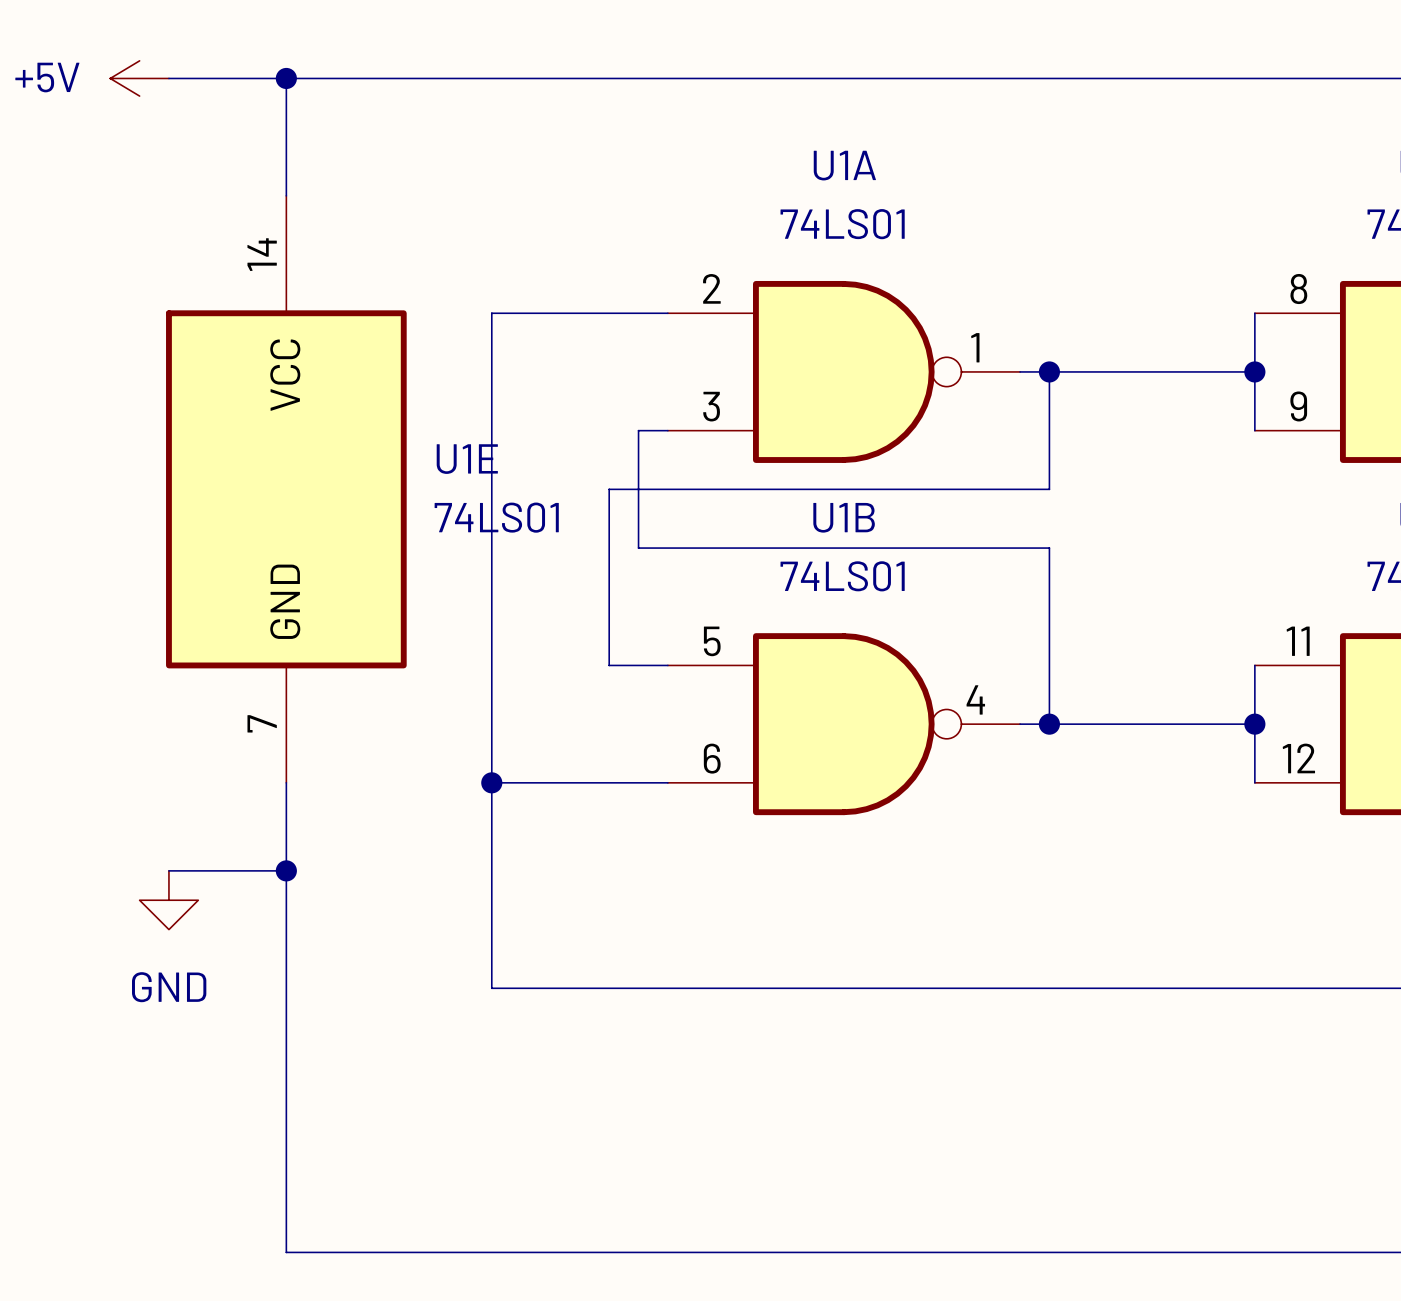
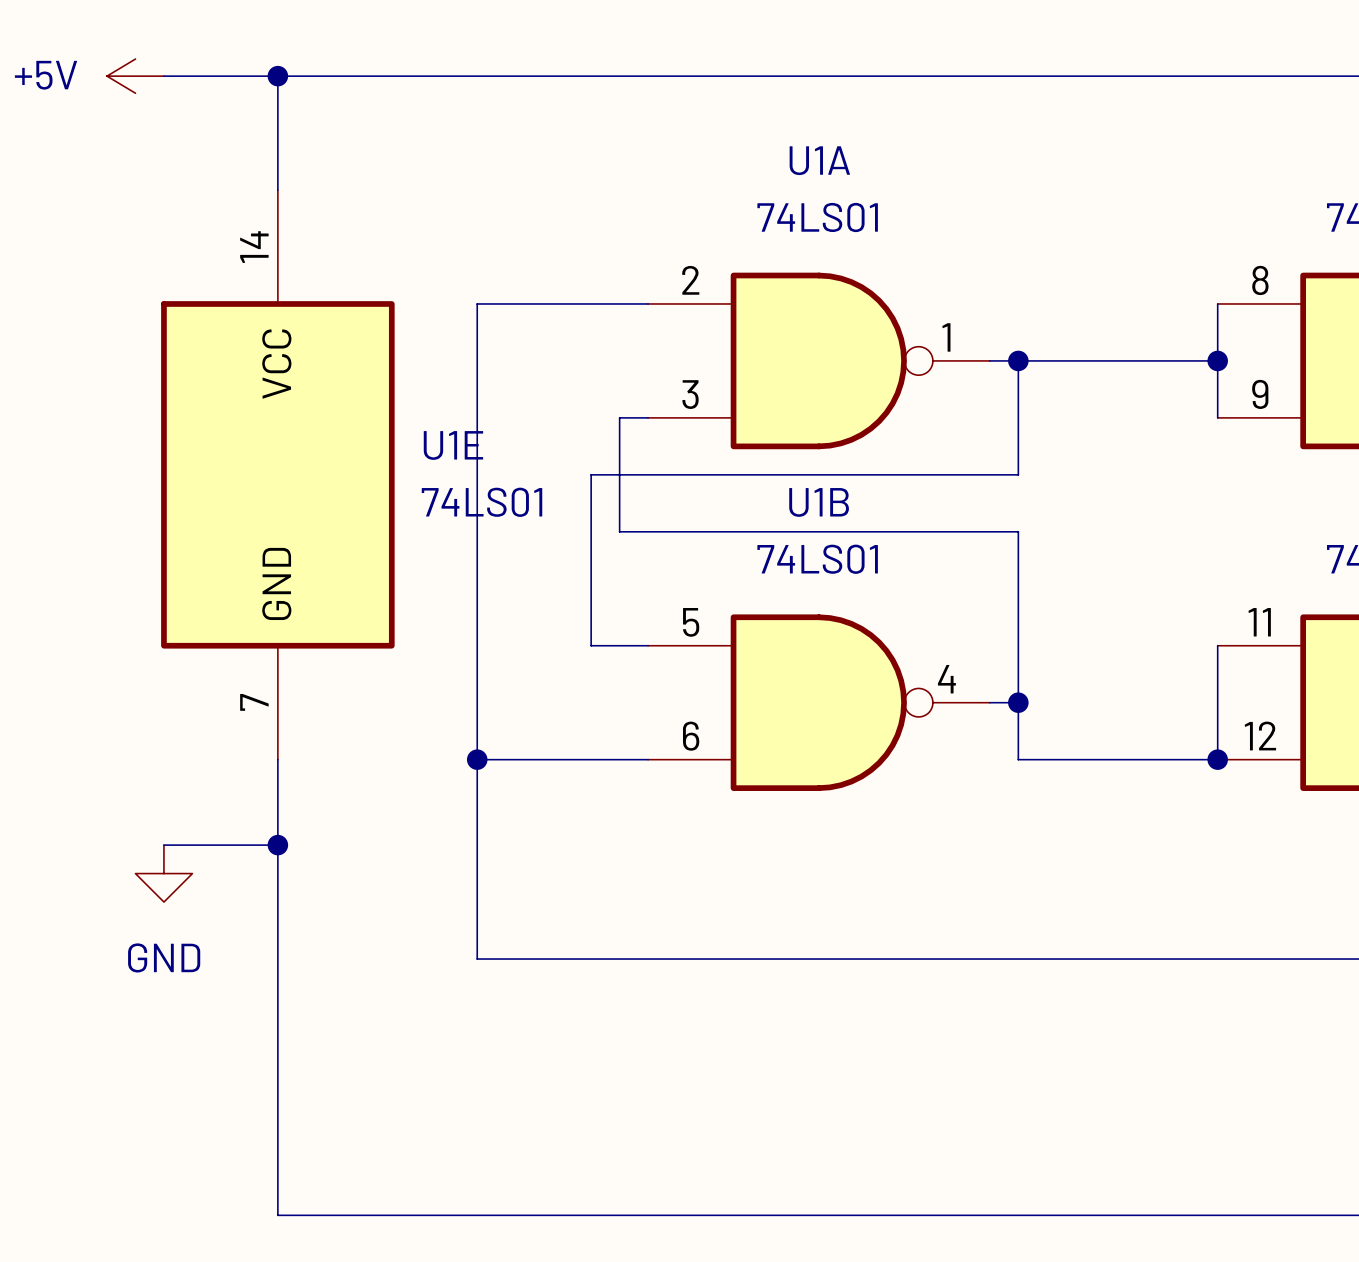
wire: (1049, 724) (1254, 724) -> (1018, 702) (1018, 759) (1217, 759)
junction position: (1254, 724) -> (1217, 759)

